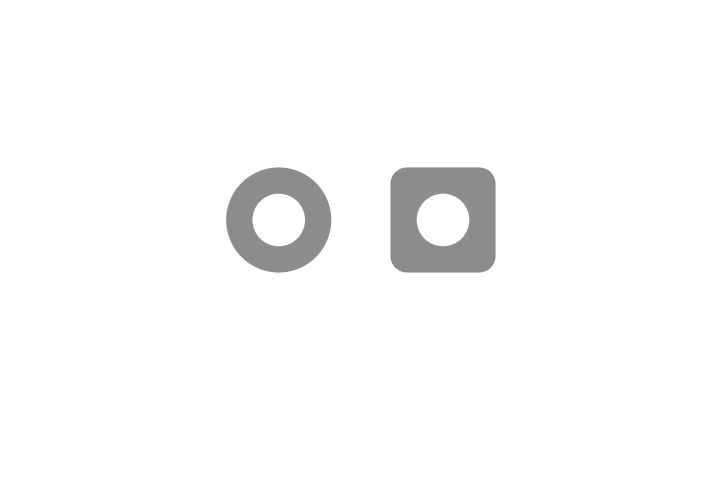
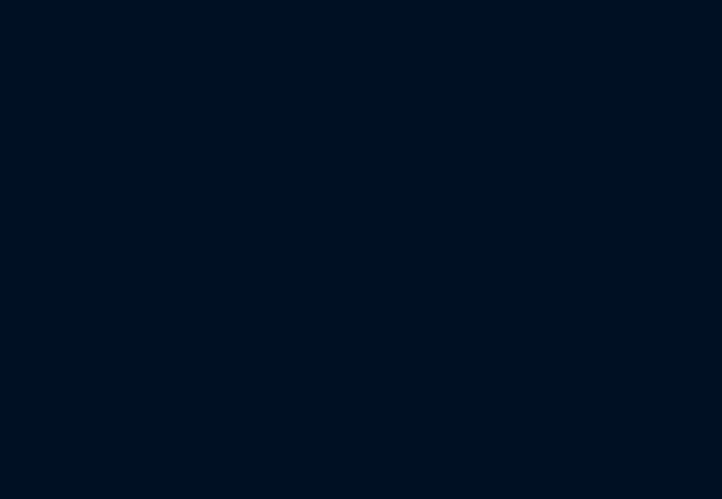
part: (360, 219) -> none

